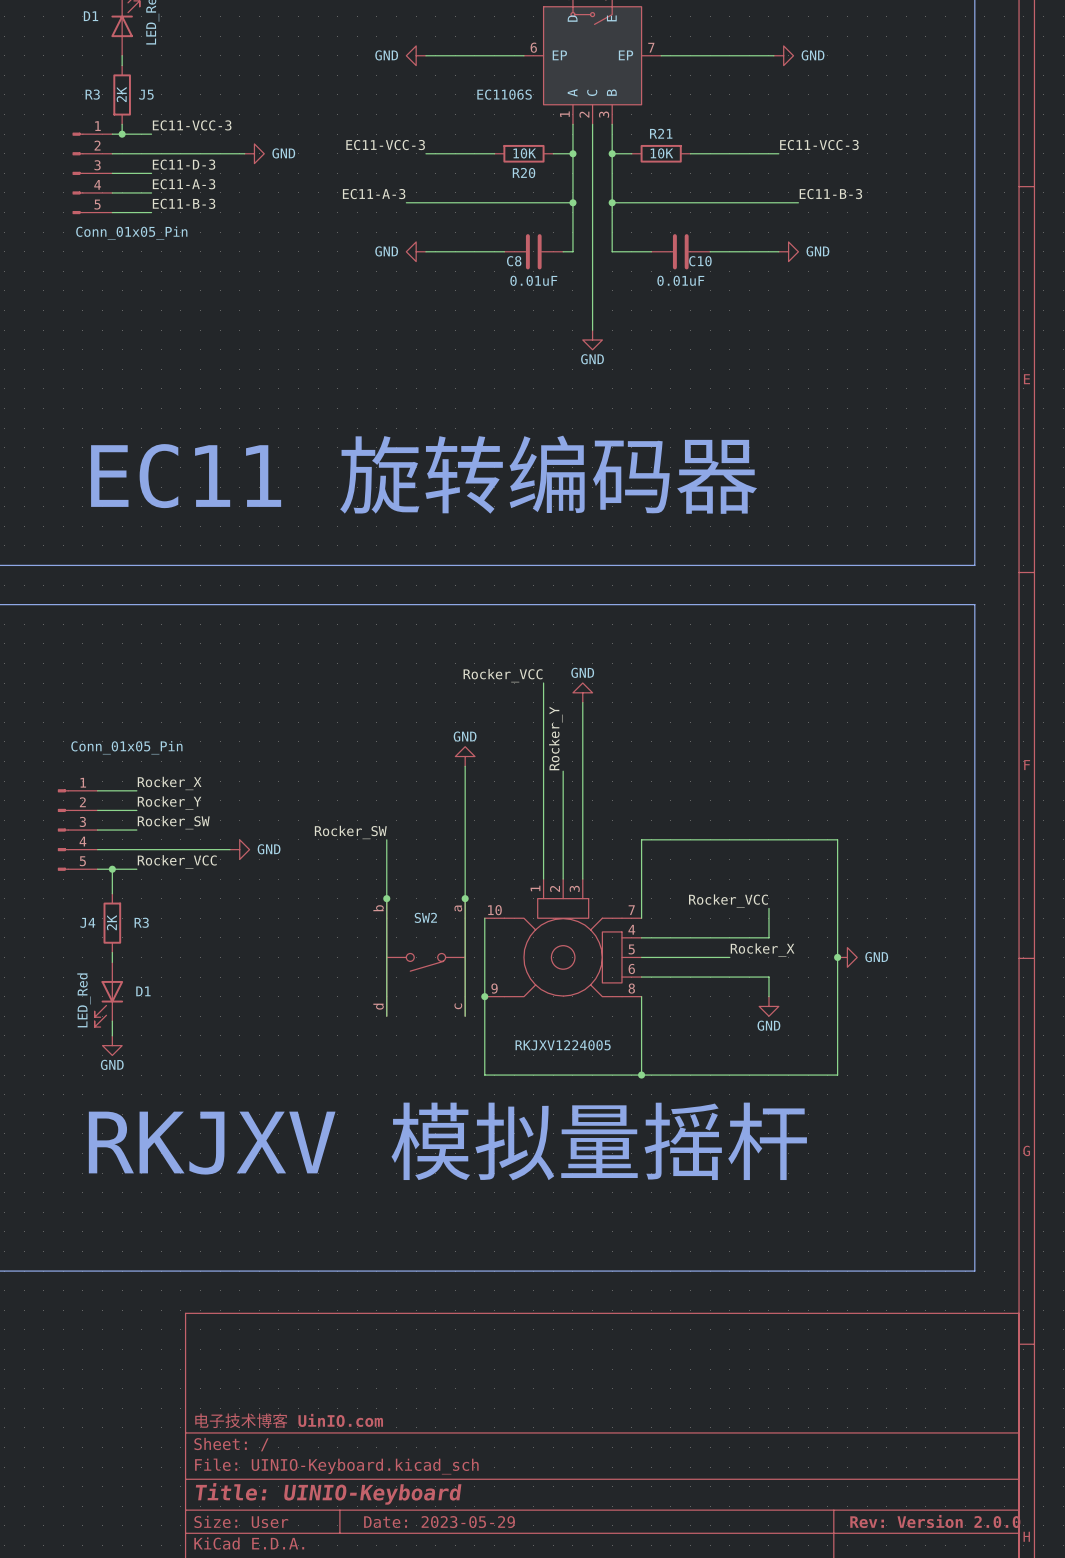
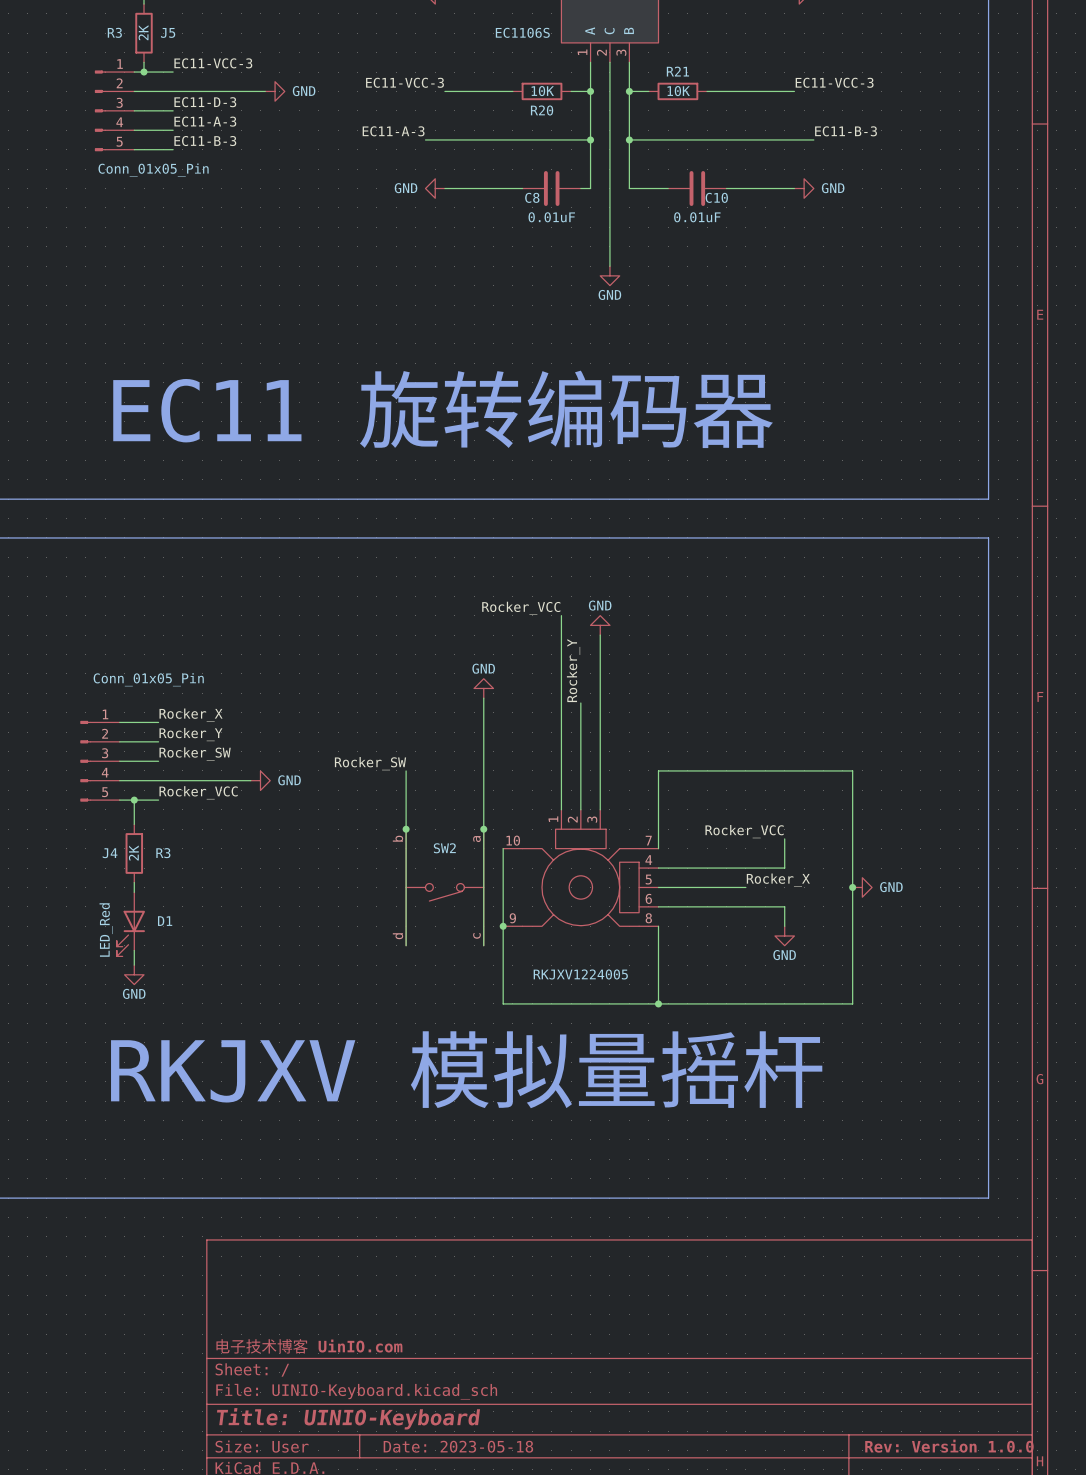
title block: Rev: Version 2.0.0 (935, 1521) -> Rev: Version 1.0.0 (949, 1446)
title block: Date: 2023-05-29 (439, 1522) -> Date: 2023-05-18 (458, 1446)

